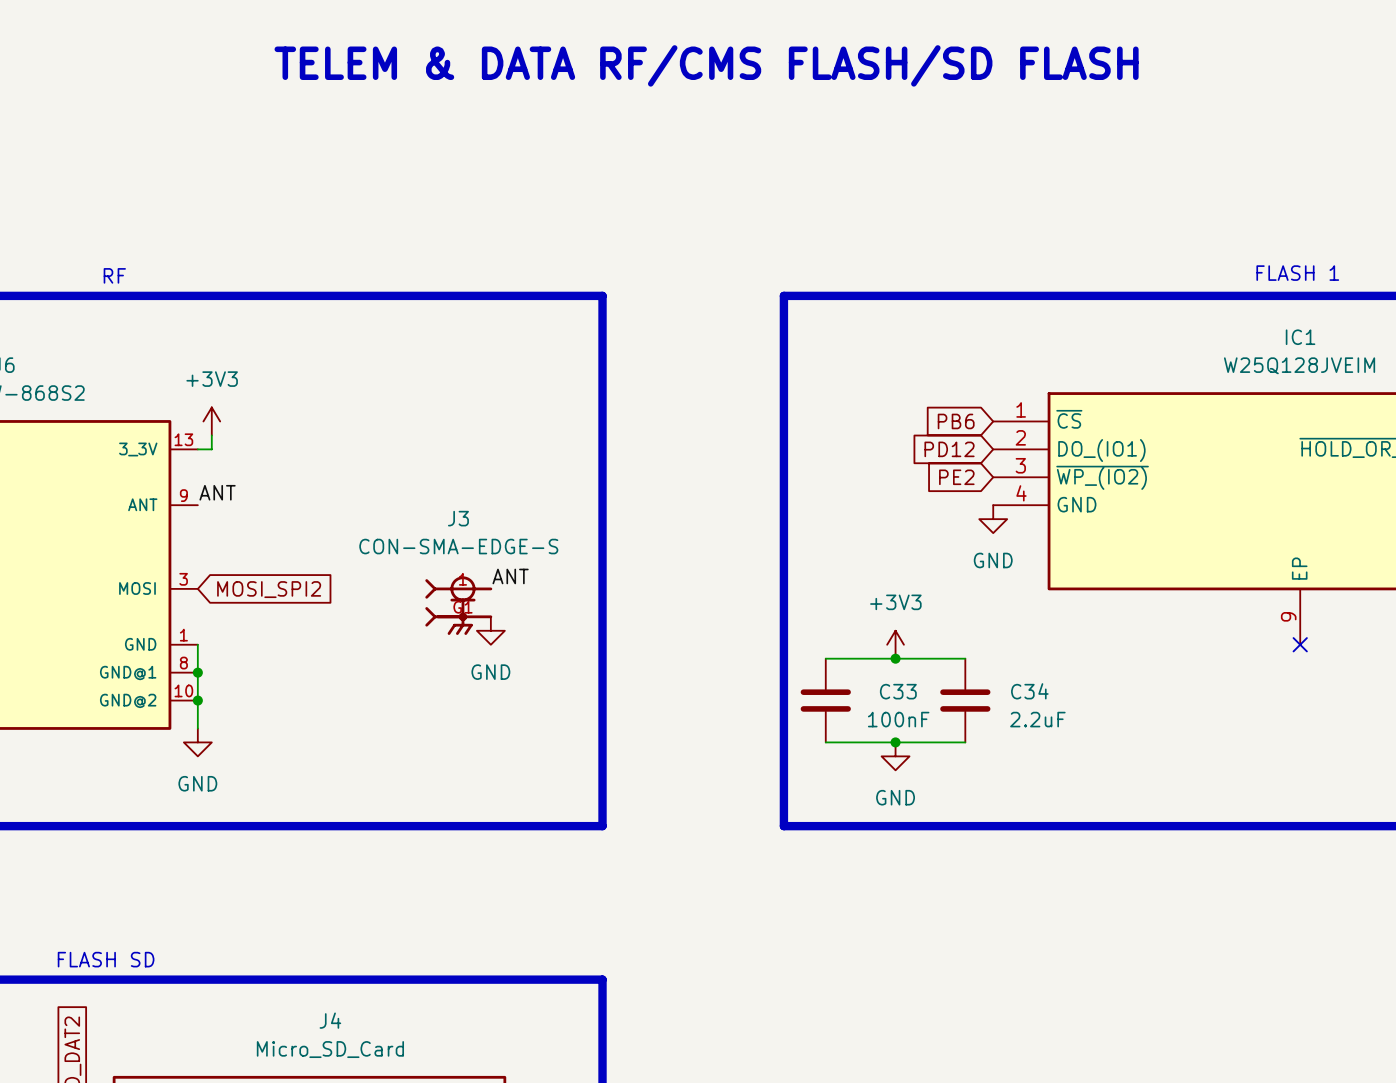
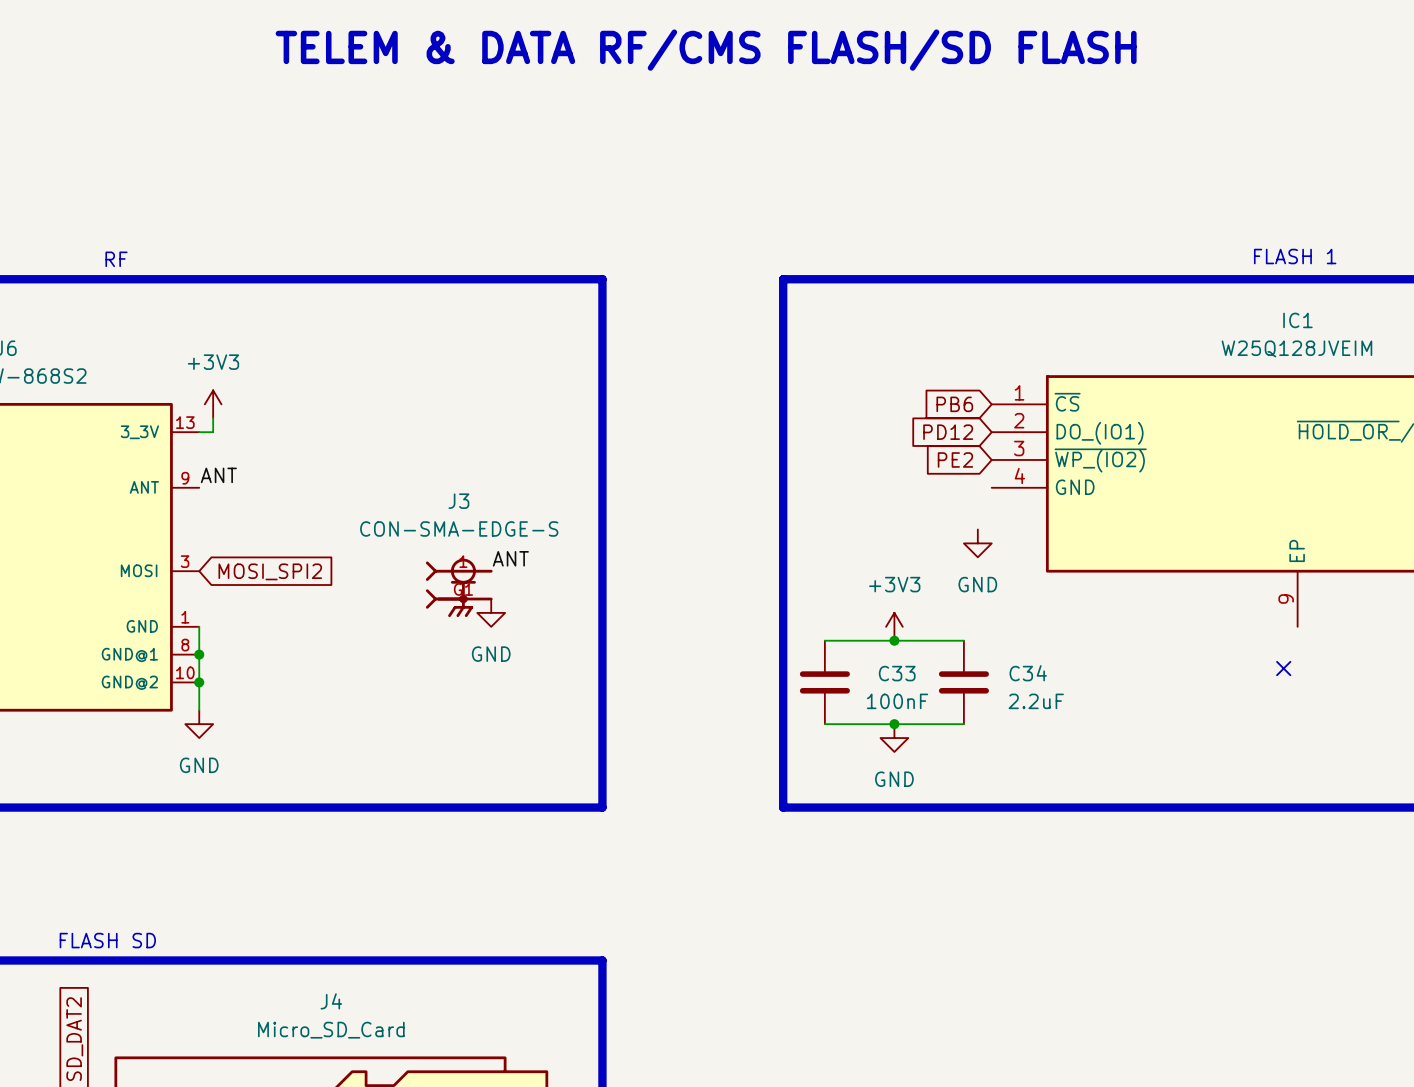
power symbol position: GND (993, 519) -> GND (977, 543)
no-connect mark position: (1300, 644) -> (1283, 668)

